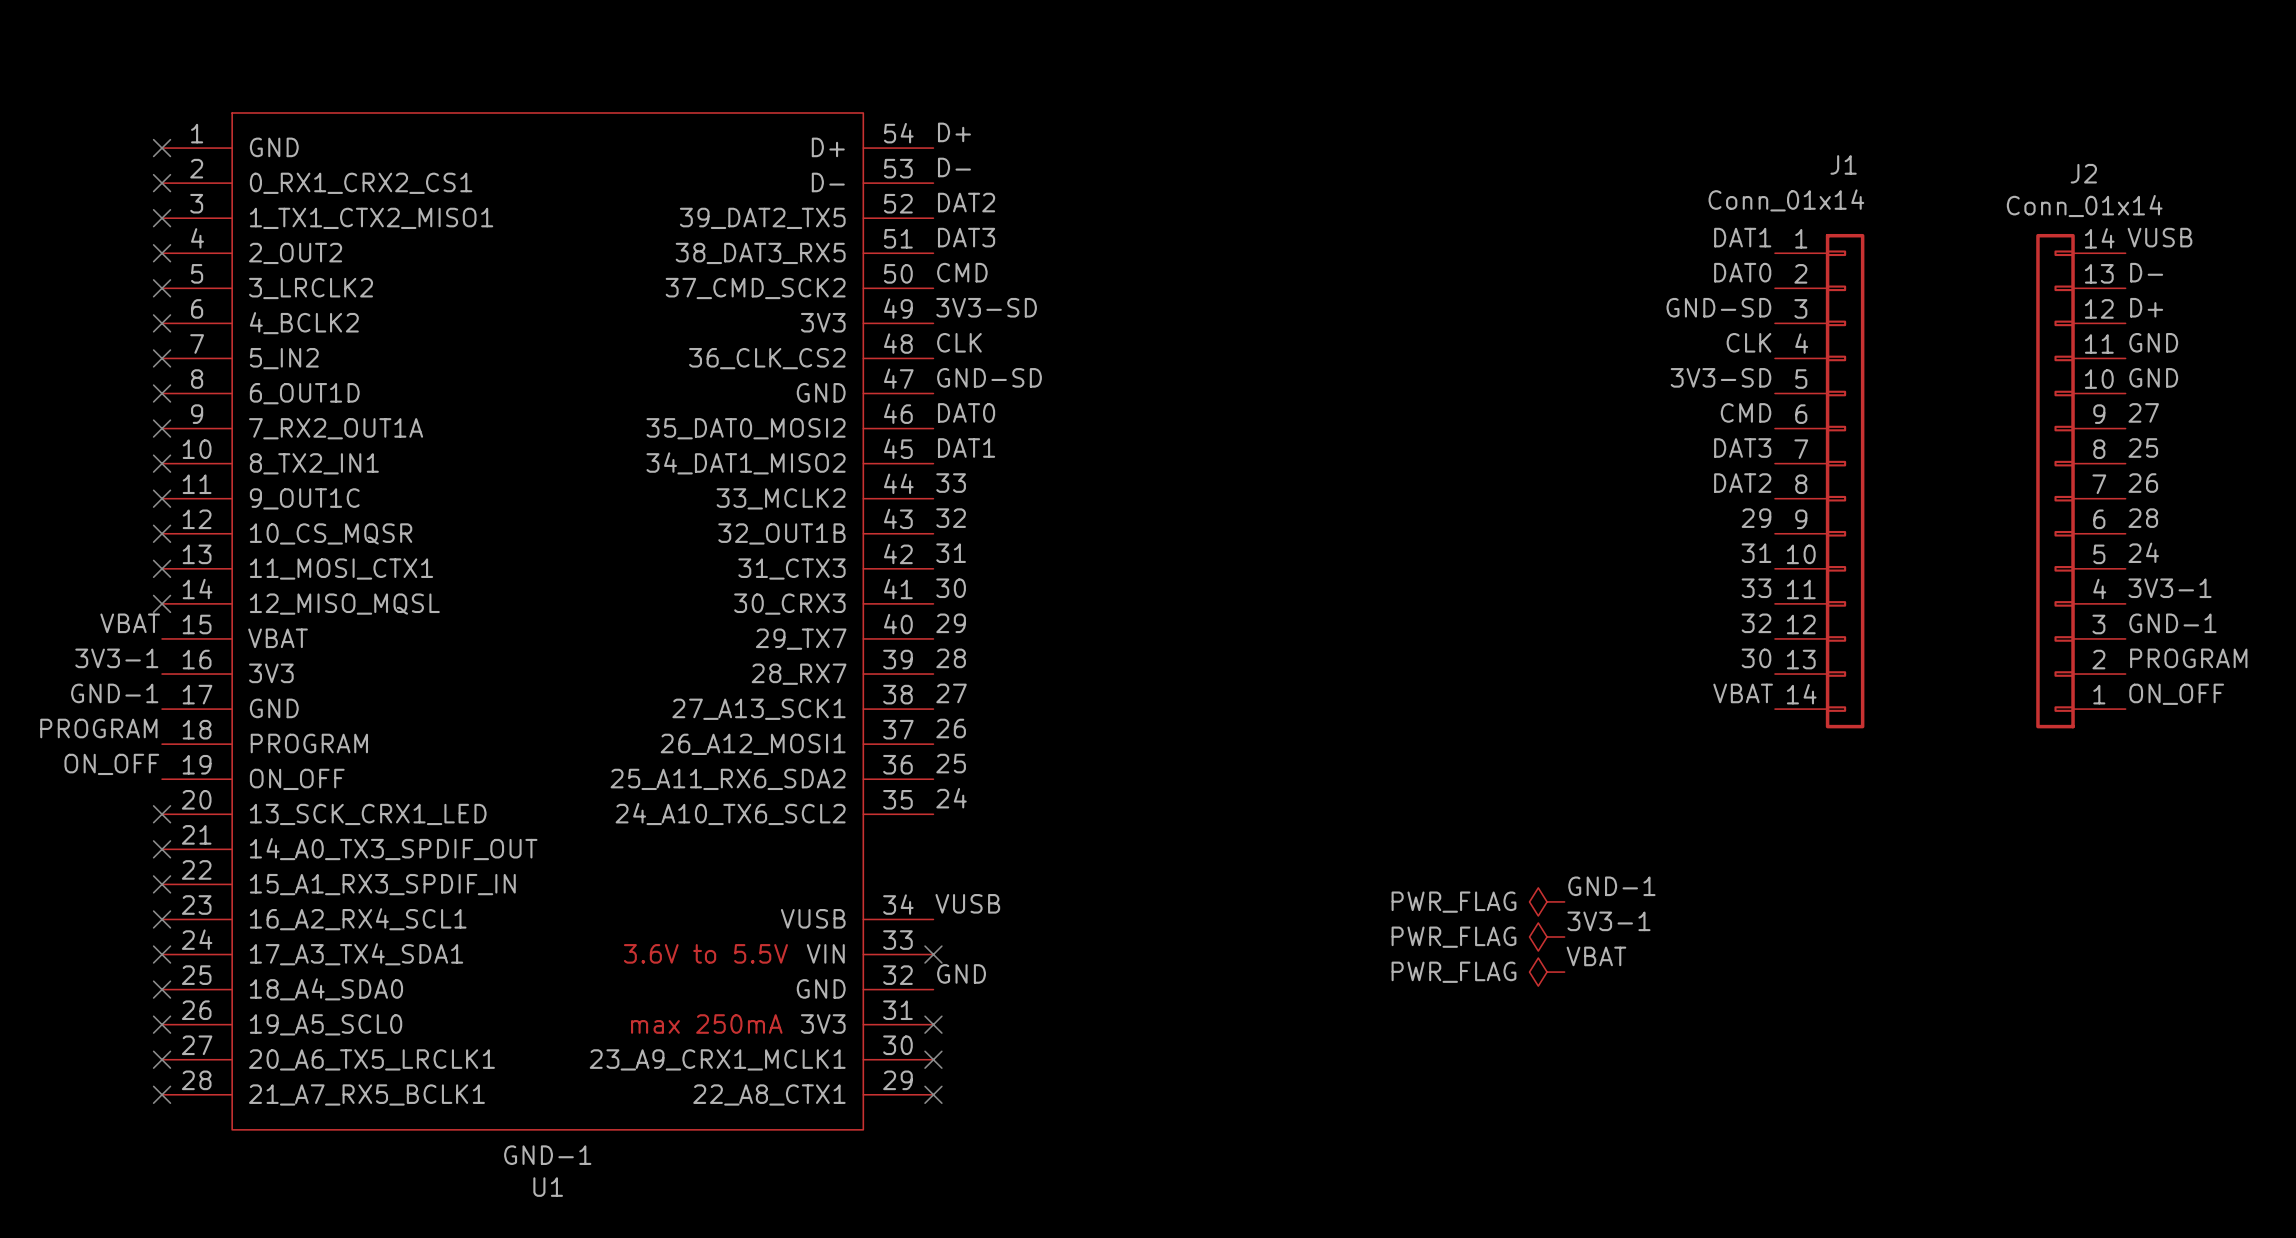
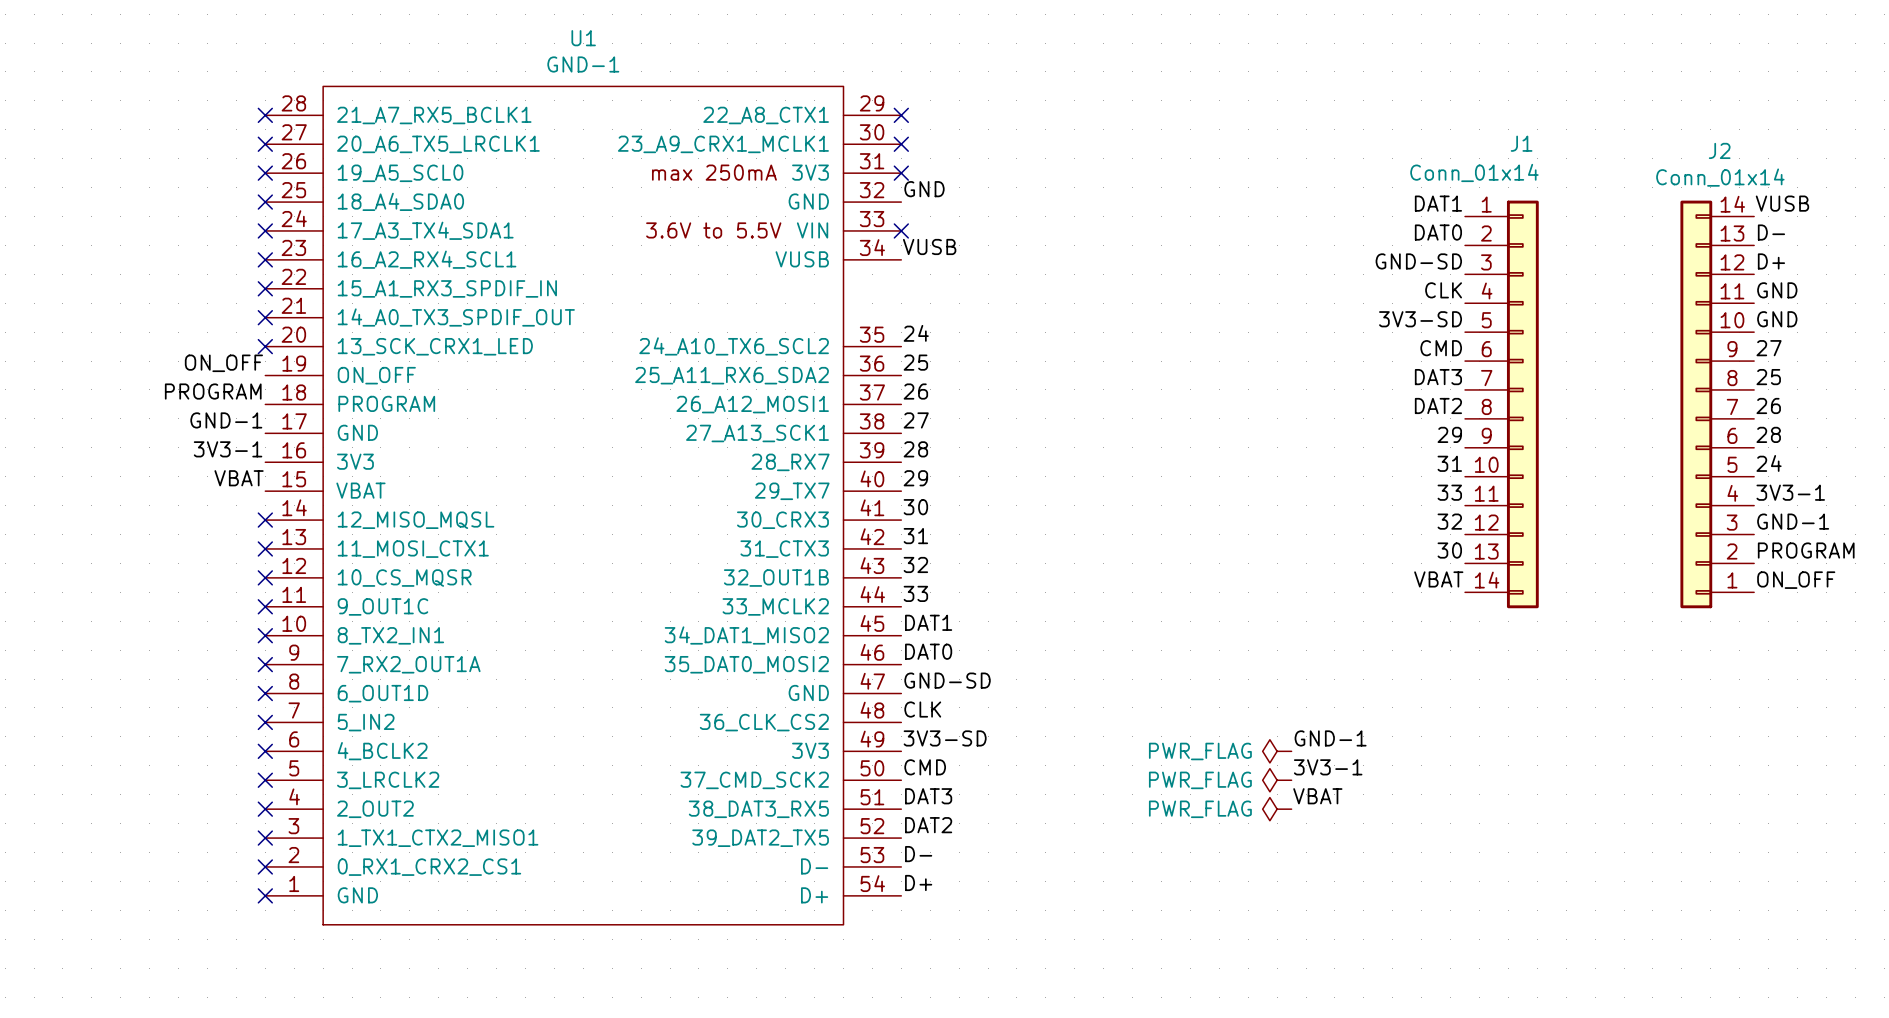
no-connect mark: none -> (265, 115)
no-connect mark: none -> (901, 115)
label: D+ (954, 132) -> none
no-connect mark: (162, 148) -> none
no-connect mark: none -> (265, 144)
no-connect mark: none -> (901, 144)
label: D- (954, 167) -> none
no-connect mark: (162, 183) -> none
no-connect mark: none -> (265, 173)
no-connect mark: none -> (901, 173)
label: DAT2 (966, 202) -> none
no-connect mark: (162, 218) -> none
label: none -> GND (924, 189)
no-connect mark: none -> (265, 202)
label: DAT3 (966, 237) -> none
no-connect mark: (162, 253) -> none
no-connect mark: none -> (265, 230)
no-connect mark: none -> (901, 230)
label: CMD (962, 272) -> none
no-connect mark: (162, 288) -> none
label: none -> VUSB (929, 246)
no-connect mark: none -> (265, 259)
label: 3V3-SD (986, 307) -> none
no-connect mark: (162, 323) -> none
no-connect mark: none -> (265, 288)
label: CLK (959, 342) -> none
no-connect mark: (162, 358) -> none
no-connect mark: none -> (265, 317)
label: GND-SD (989, 377) -> none
no-connect mark: (162, 393) -> none
label: none -> 24 (916, 333)
no-connect mark: none -> (265, 346)
label: DAT0 (966, 412) -> none
no-connect mark: (162, 428) -> none
label: none -> 25 (915, 362)
label: none -> ON_OFF (223, 363)
label position: DAT1 (966, 447) -> DAT1 (928, 622)
no-connect mark: (162, 463) -> none
label position: 33 (951, 483) -> 33 (915, 593)
no-connect mark: (162, 498) -> none
label position: 32 (951, 518) -> 32 (915, 564)
no-connect mark: (162, 533) -> none
label position: 31 (951, 553) -> 31 (915, 536)
no-connect mark: (162, 568) -> none
label position: 30 (951, 588) -> 30 (915, 507)
no-connect mark: (162, 603) -> none
no-connect mark: none -> (265, 520)
U1 flip: as is (547, 621) -> up-down (583, 505)
label position: VBAT (130, 623) -> VBAT (239, 478)
label position: 29 (951, 623) -> 29 (915, 478)
no-connect mark: none -> (265, 548)
label position: 3V3-1 (116, 658) -> 3V3-1 (228, 449)
label position: 28 (951, 658) -> 28 (915, 449)
no-connect mark: none -> (265, 577)
label position: GND-1 (114, 693) -> GND-1 (226, 420)
label position: 27 (951, 693) -> 27 (916, 420)
no-connect mark: none -> (265, 606)
label position: PROGRAM (98, 728) -> PROGRAM (213, 391)
label position: 26 (951, 728) -> 26 (915, 391)
no-connect mark: none -> (265, 635)
label: 25 (951, 763) -> none
label: ON_OFF (111, 764) -> none
label: none -> DAT0 (928, 651)
no-connect mark: none -> (265, 664)
label: 24 (951, 798) -> none
no-connect mark: (162, 814) -> none
label: none -> GND-SD (947, 680)
no-connect mark: none -> (265, 693)
no-connect mark: (162, 849) -> none
label: none -> CLK (922, 709)
no-connect mark: none -> (265, 722)
no-connect mark: (162, 884) -> none
label: none -> 3V3-SD (945, 738)
no-connect mark: none -> (265, 751)
label: VUSB (967, 903) -> none
no-connect mark: (162, 919) -> none
label: none -> CMD (925, 767)
no-connect mark: none -> (265, 780)
no-connect mark: (162, 954) -> none
no-connect mark: (933, 954) -> none
label: none -> DAT3 (928, 796)
no-connect mark: none -> (265, 809)
label: GND (961, 973) -> none
no-connect mark: (162, 989) -> none
label: none -> DAT2 (928, 825)
no-connect mark: none -> (265, 838)
no-connect mark: (162, 1024) -> none
no-connect mark: (933, 1024) -> none
label: none -> D- (918, 854)
no-connect mark: none -> (265, 866)
no-connect mark: (162, 1059) -> none
no-connect mark: (933, 1059) -> none
label: none -> D+ (918, 882)
no-connect mark: none -> (265, 895)
no-connect mark: (162, 1094) -> none
no-connect mark: (933, 1094) -> none

